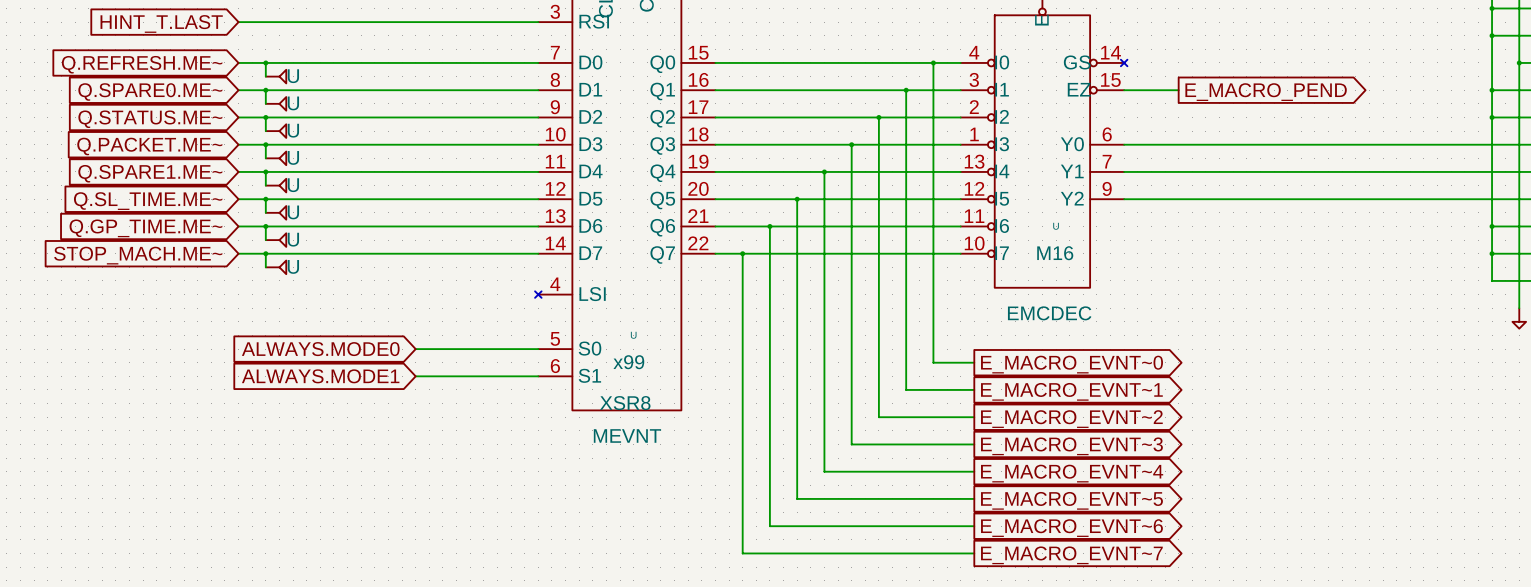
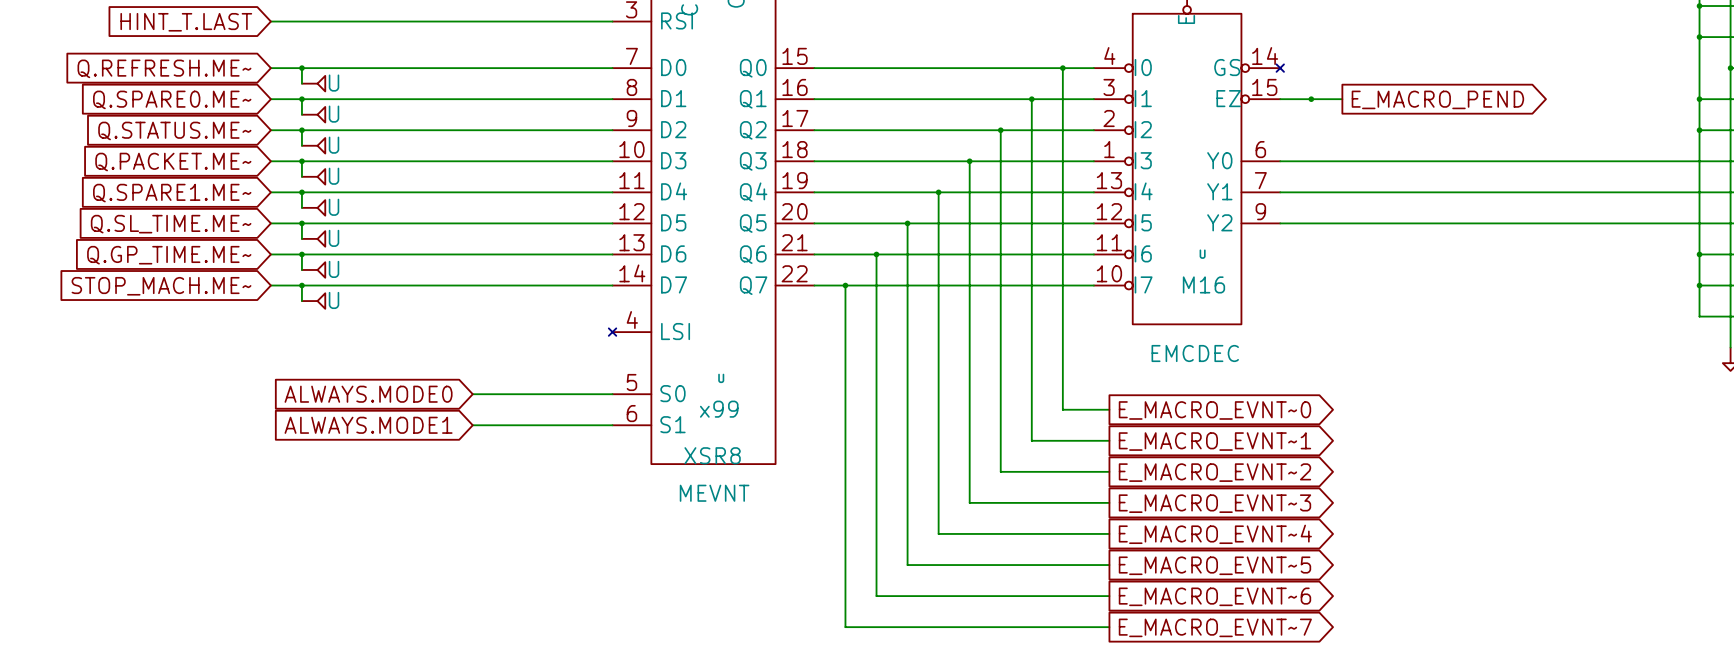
junction: none -> (1311, 99)

